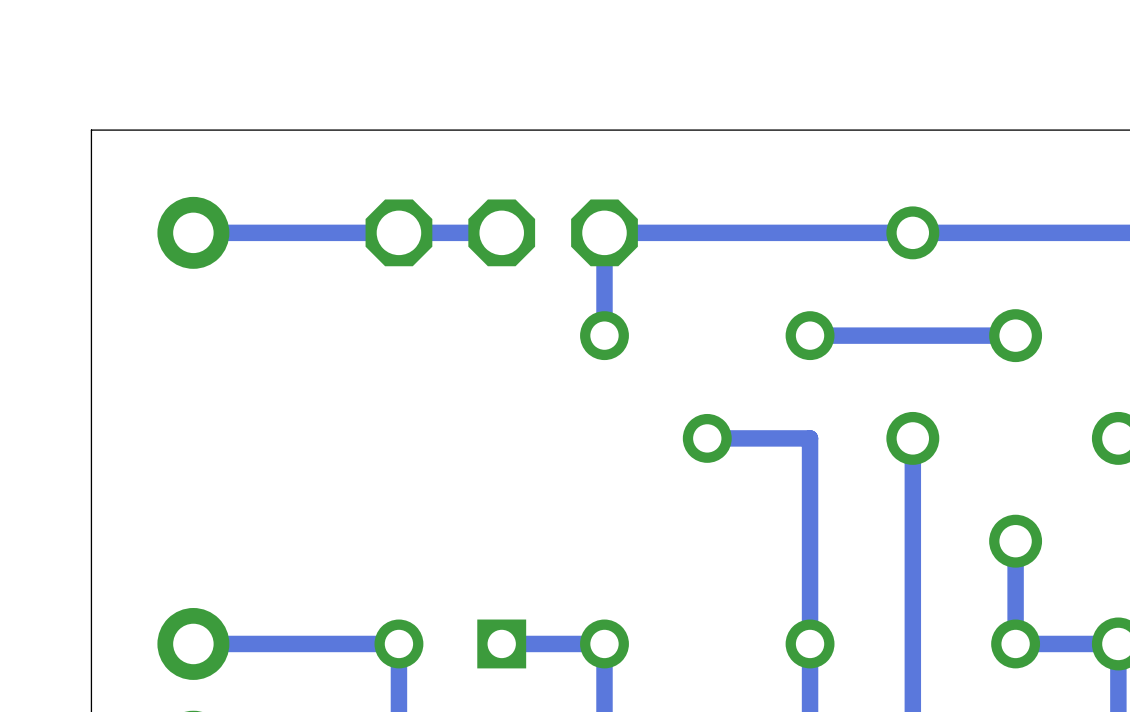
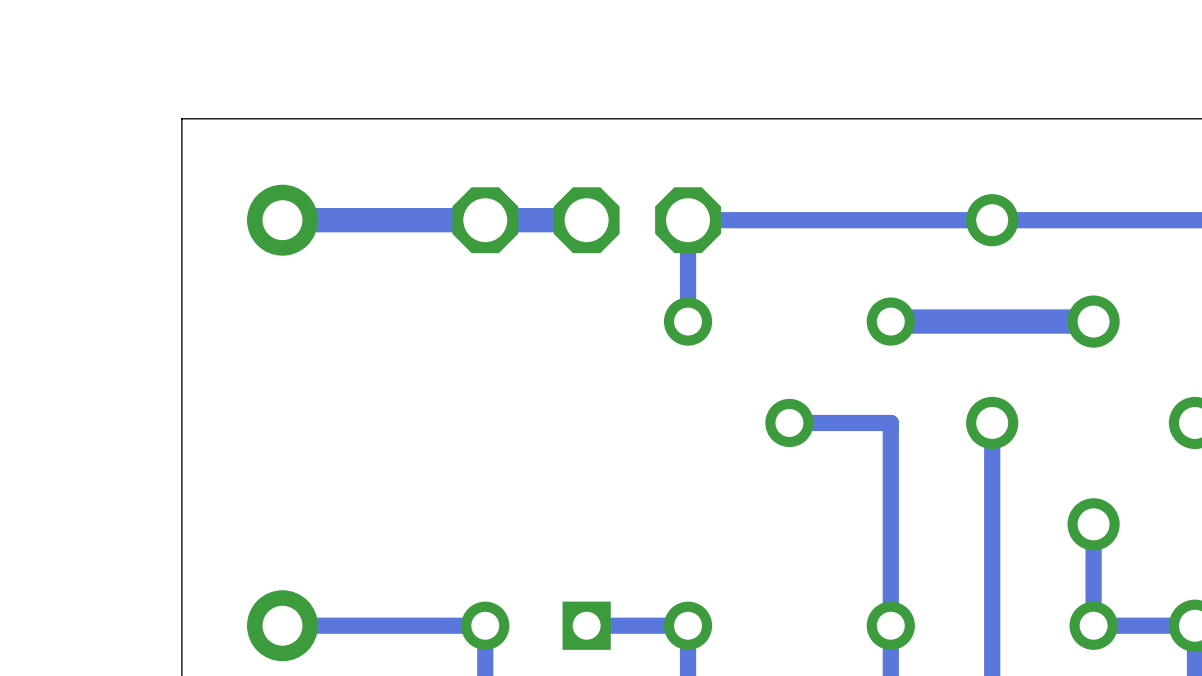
bottom track width: thin (501, 232) (193, 232) -> thick (586, 220) (282, 220)
bottom track width: thin (1015, 335) (810, 335) -> thick (1093, 321) (890, 321)

